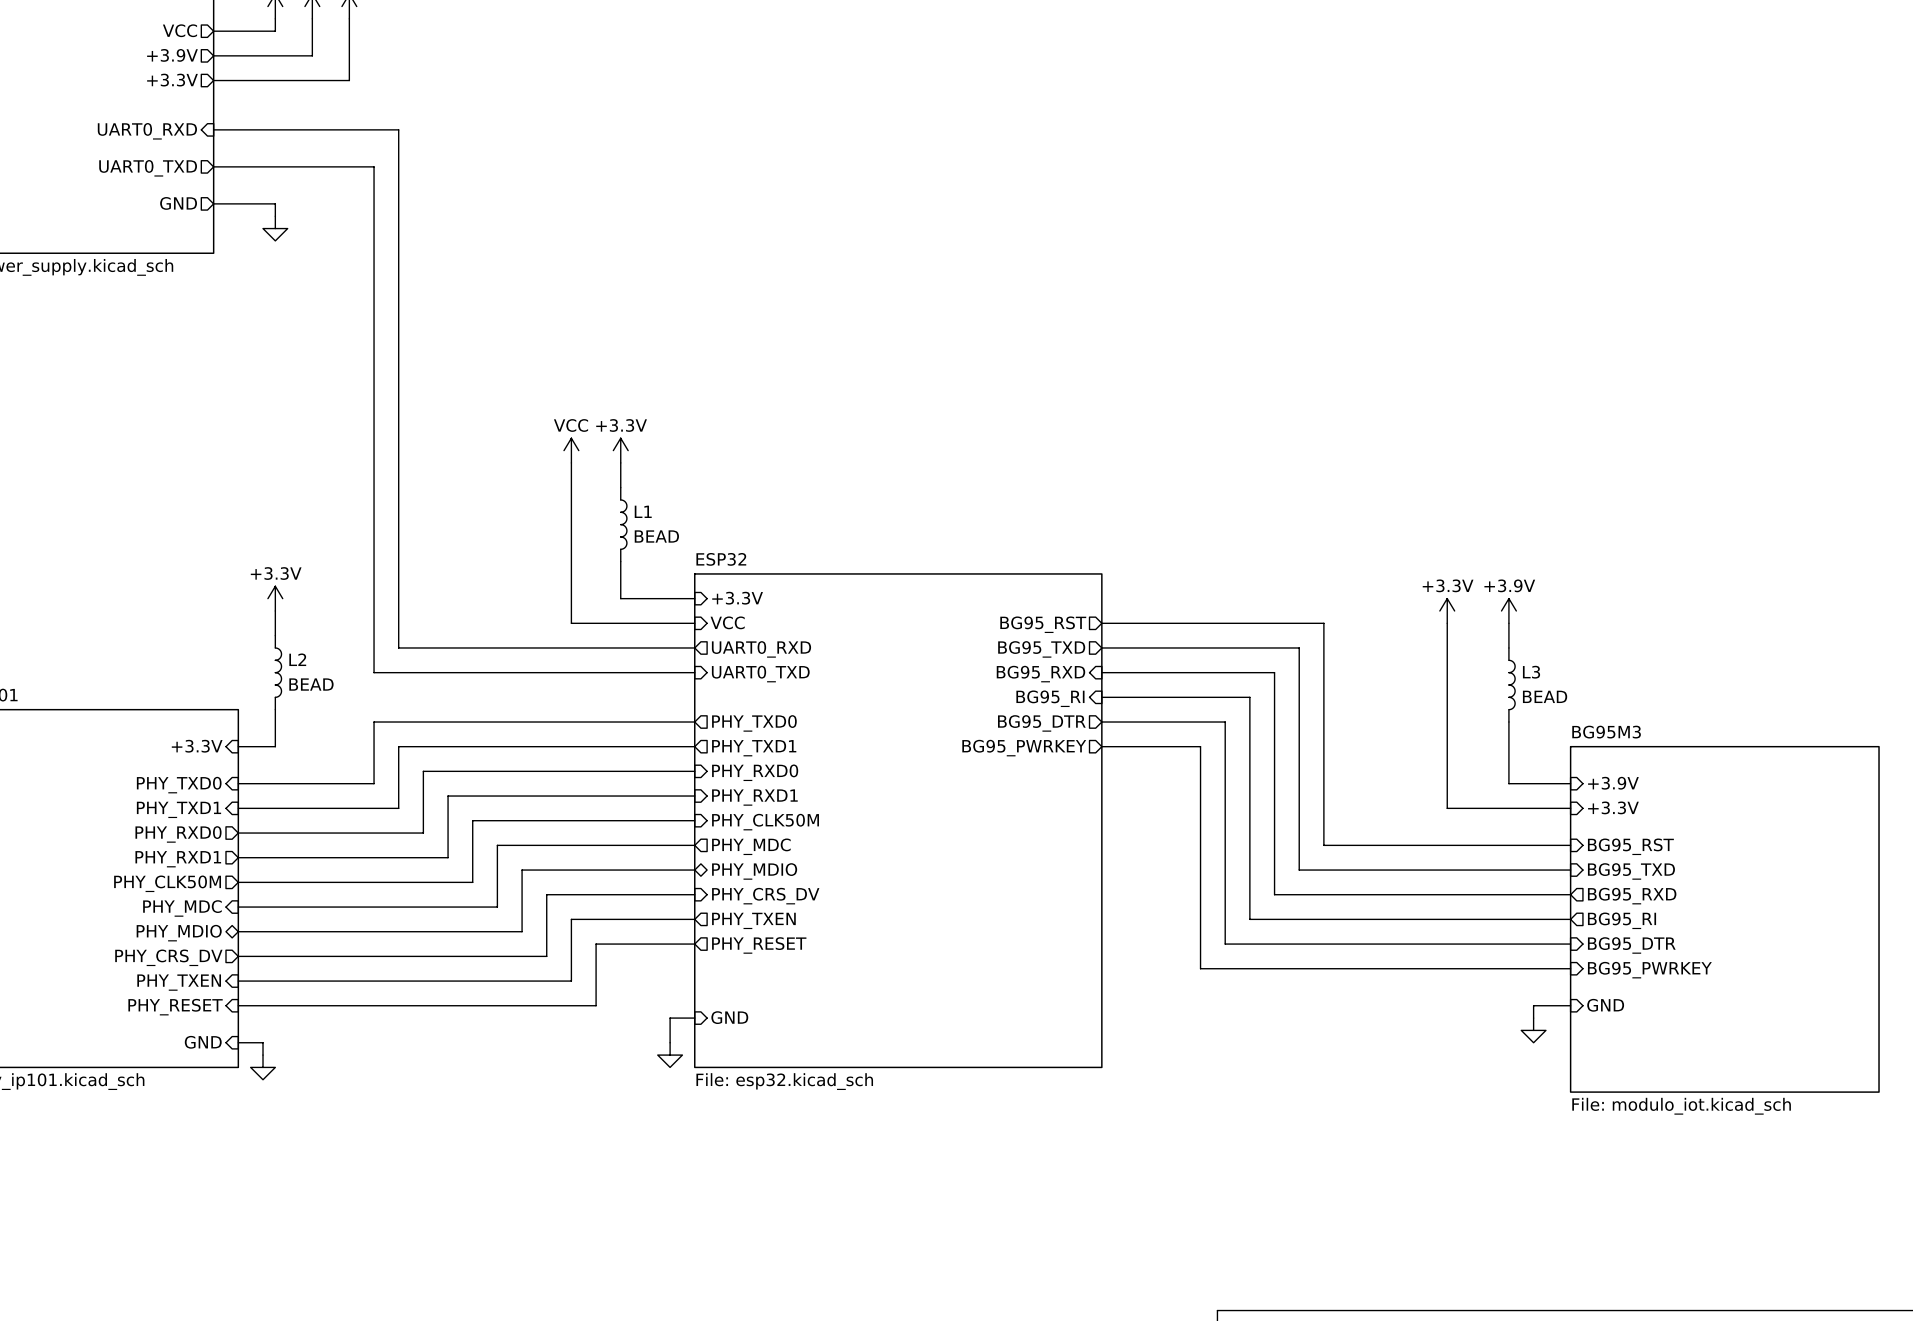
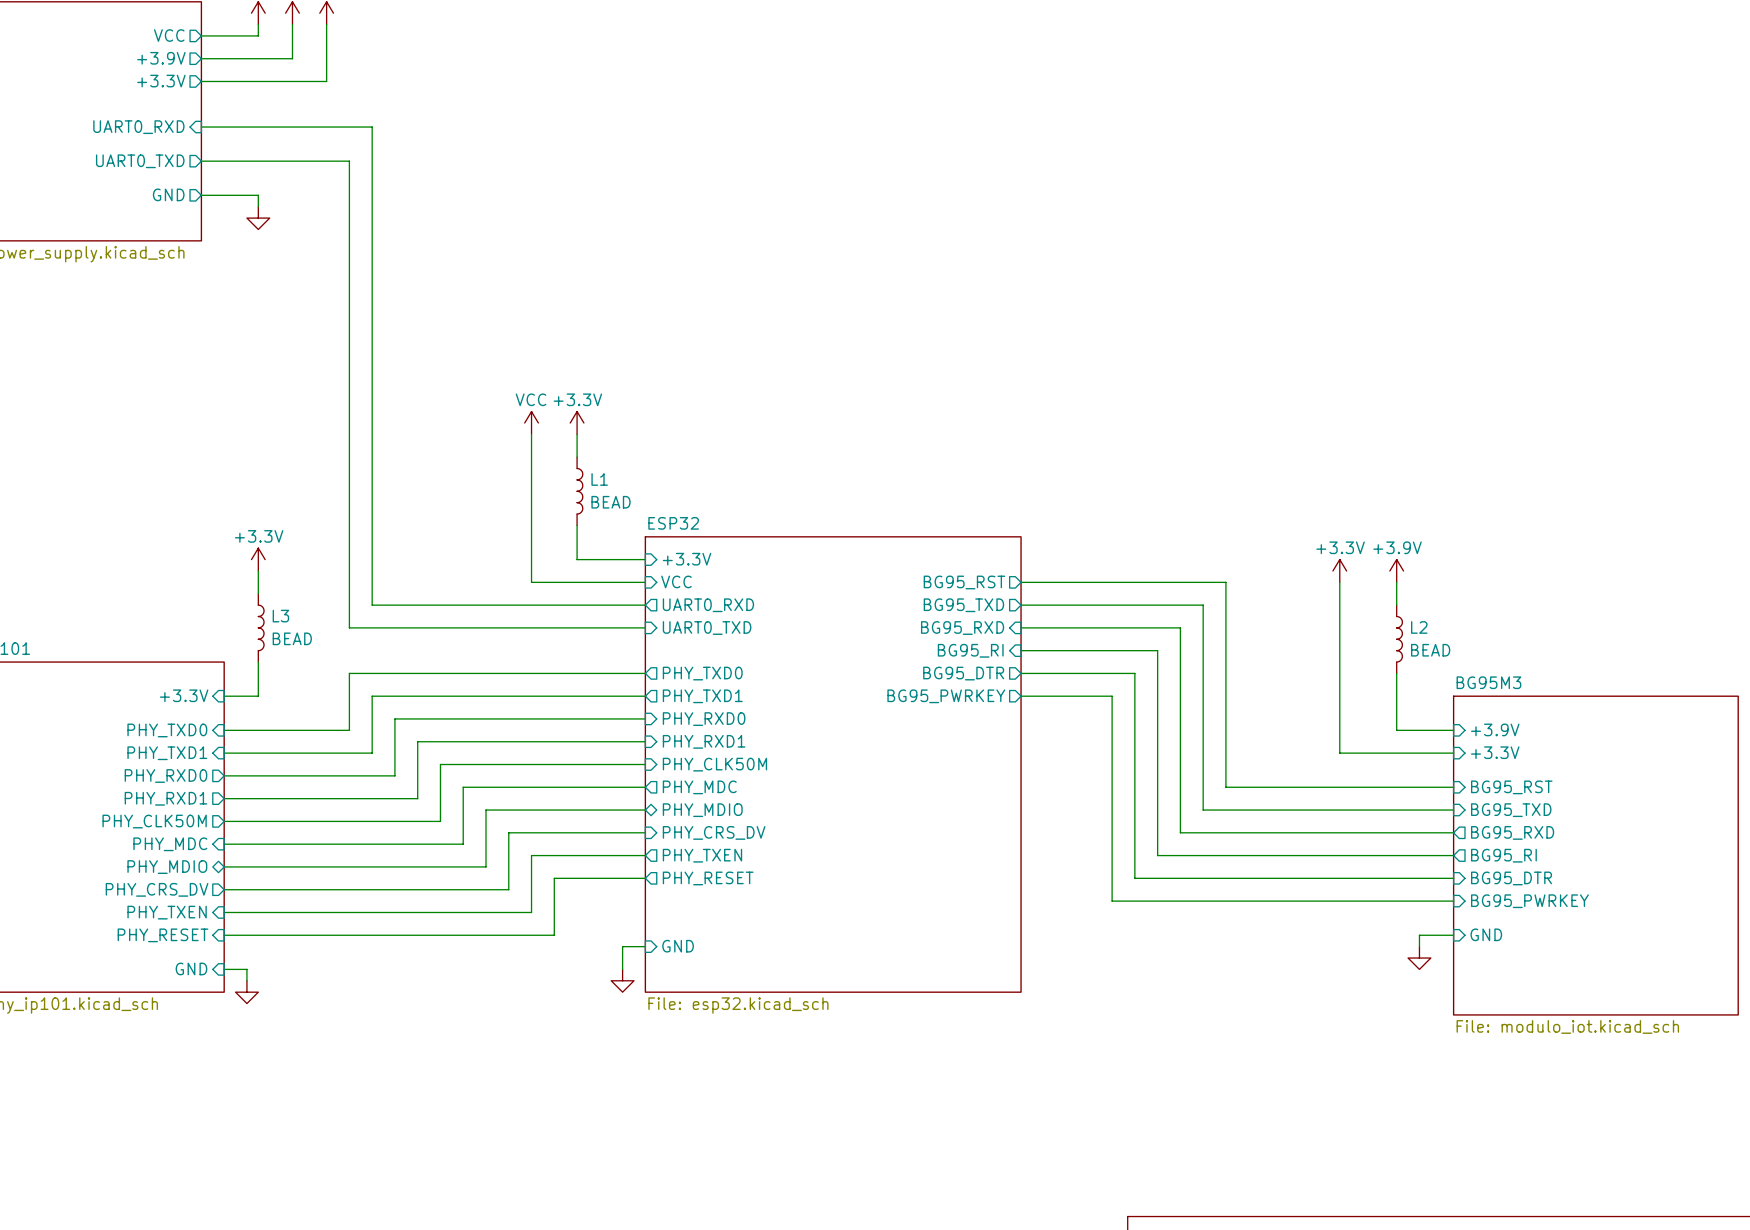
L2 name: L2 (297, 659) -> L3 (280, 616)
L3 name: L3 (1531, 672) -> L2 (1419, 627)

